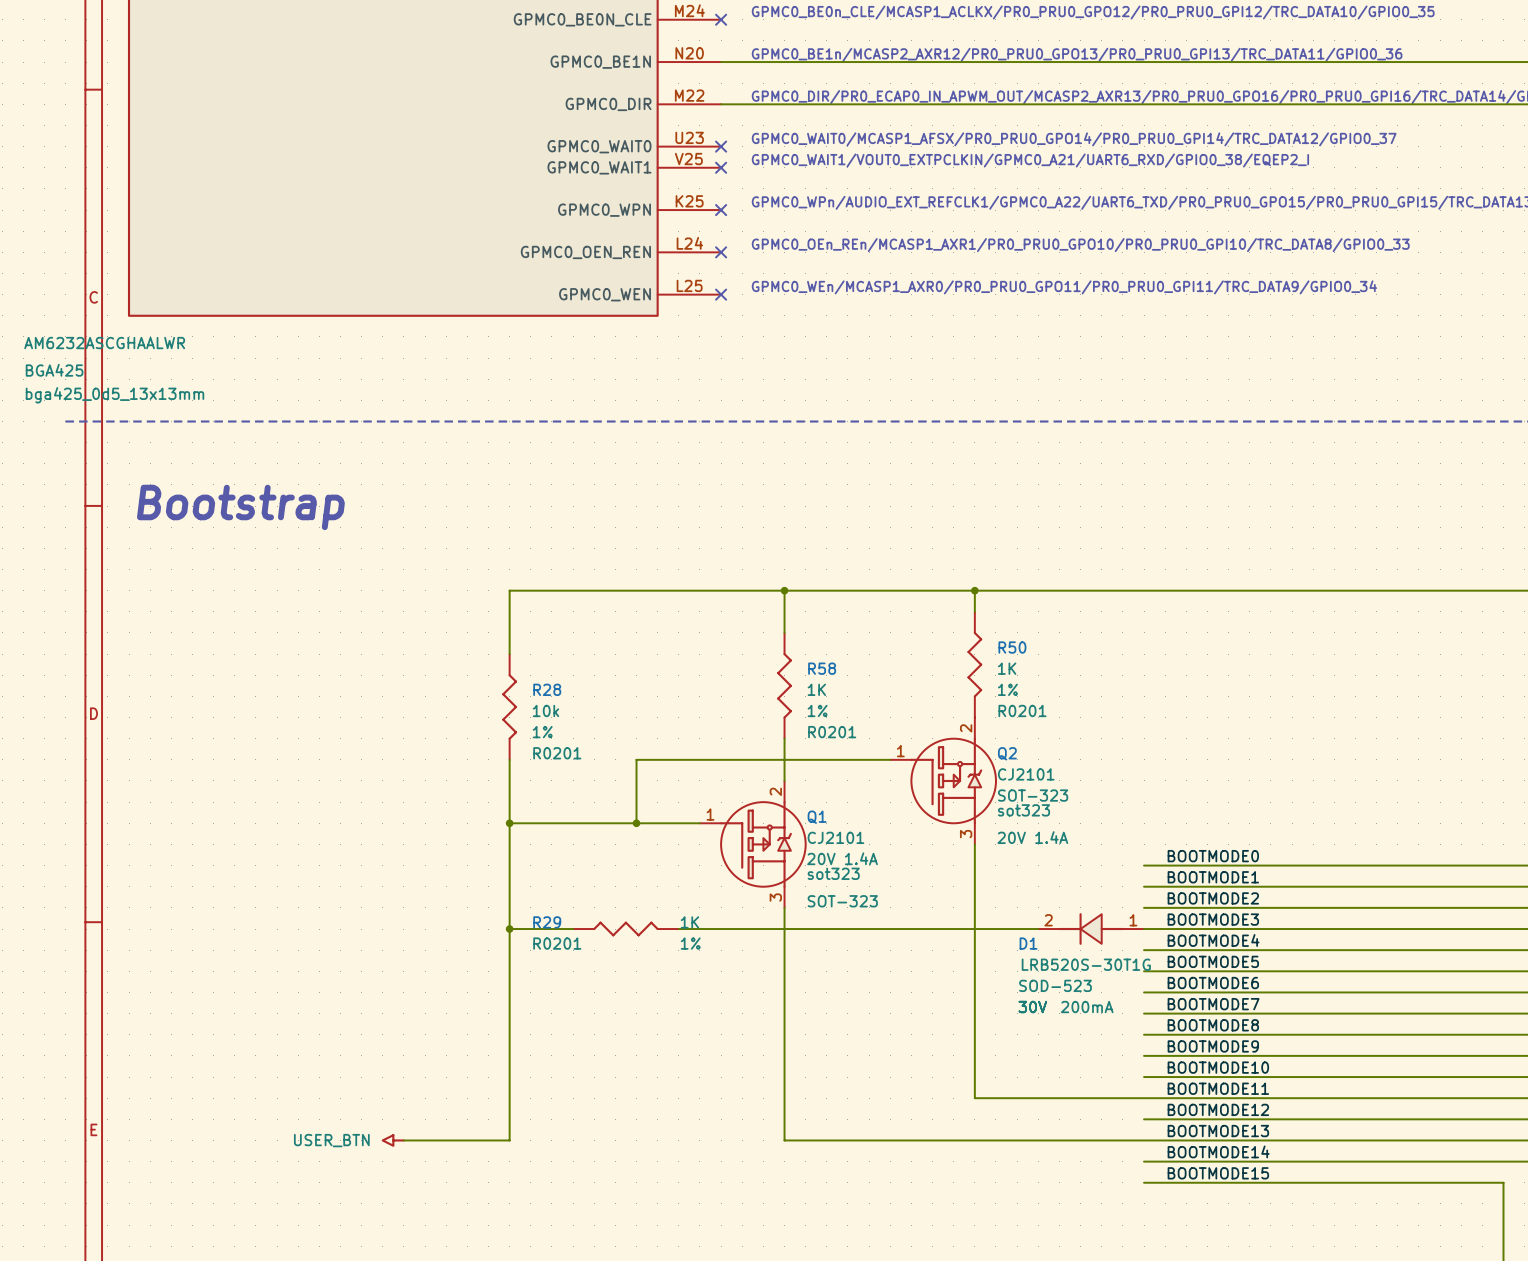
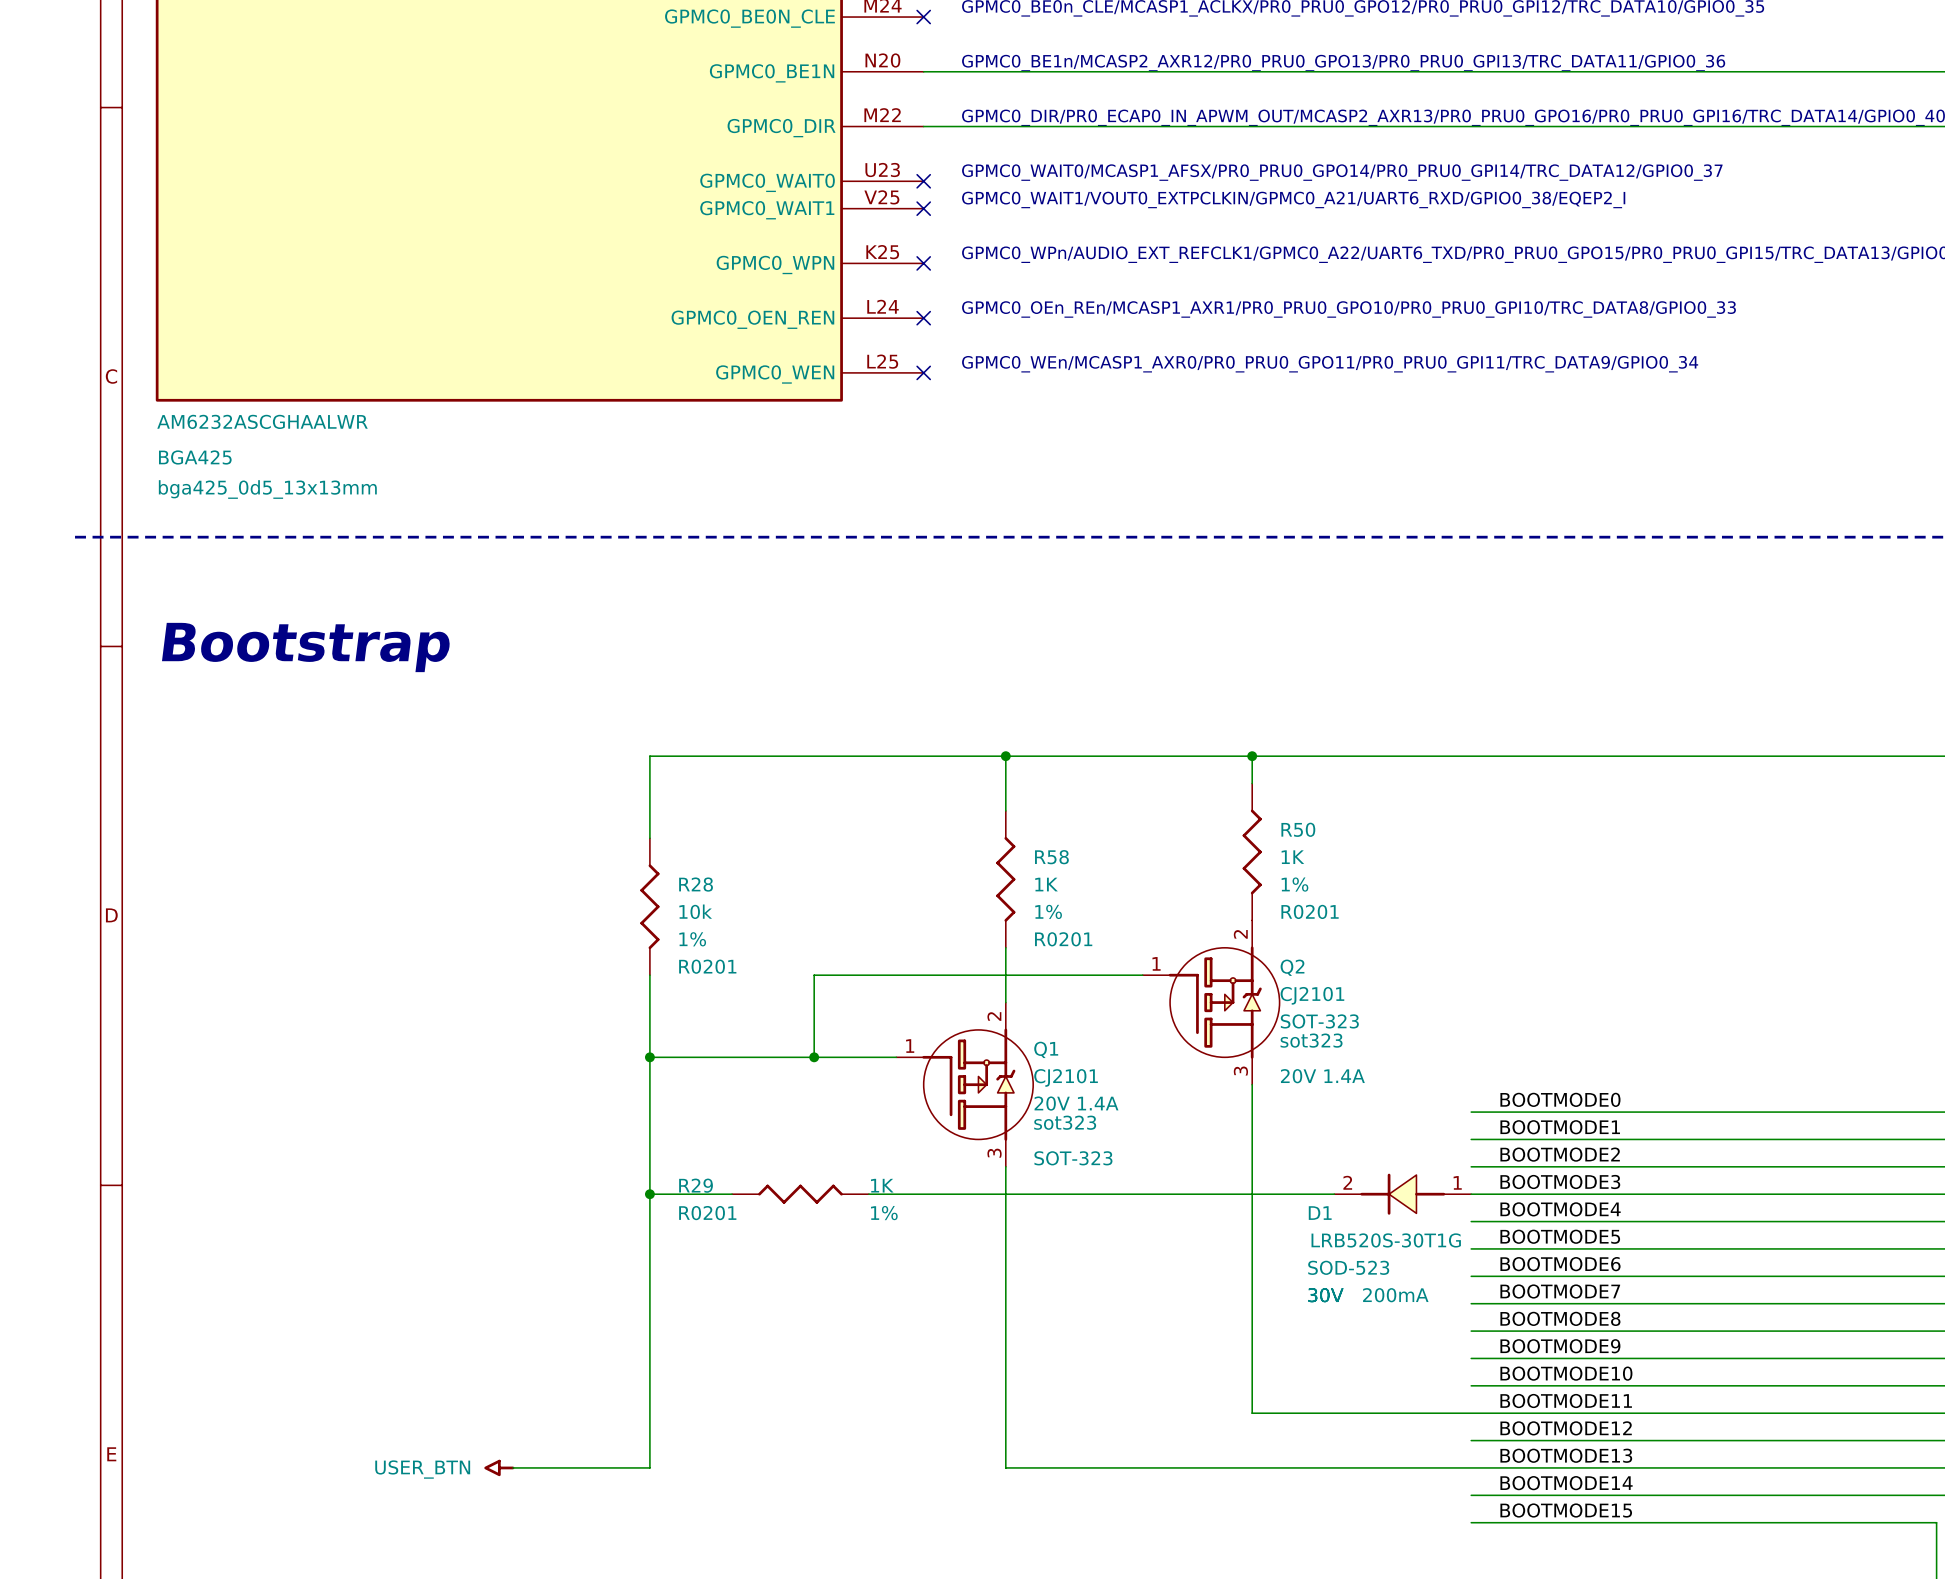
part value position: AM6232ASCGHAALWR (104, 343) -> AM6232ASCGHAALWR (262, 421)
part text position: BGA425 (54, 370) -> BGA425 (195, 457)
part text position: bga425_0d5_13x13mm (114, 395) -> bga425_0d5_13x13mm (267, 489)

